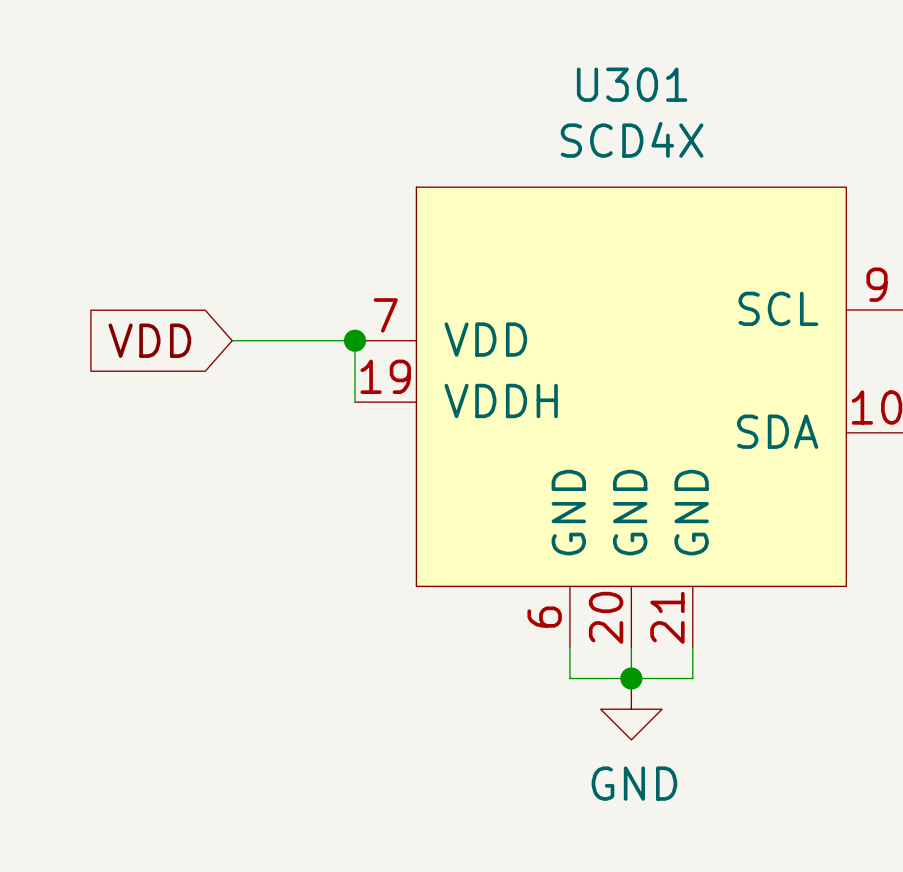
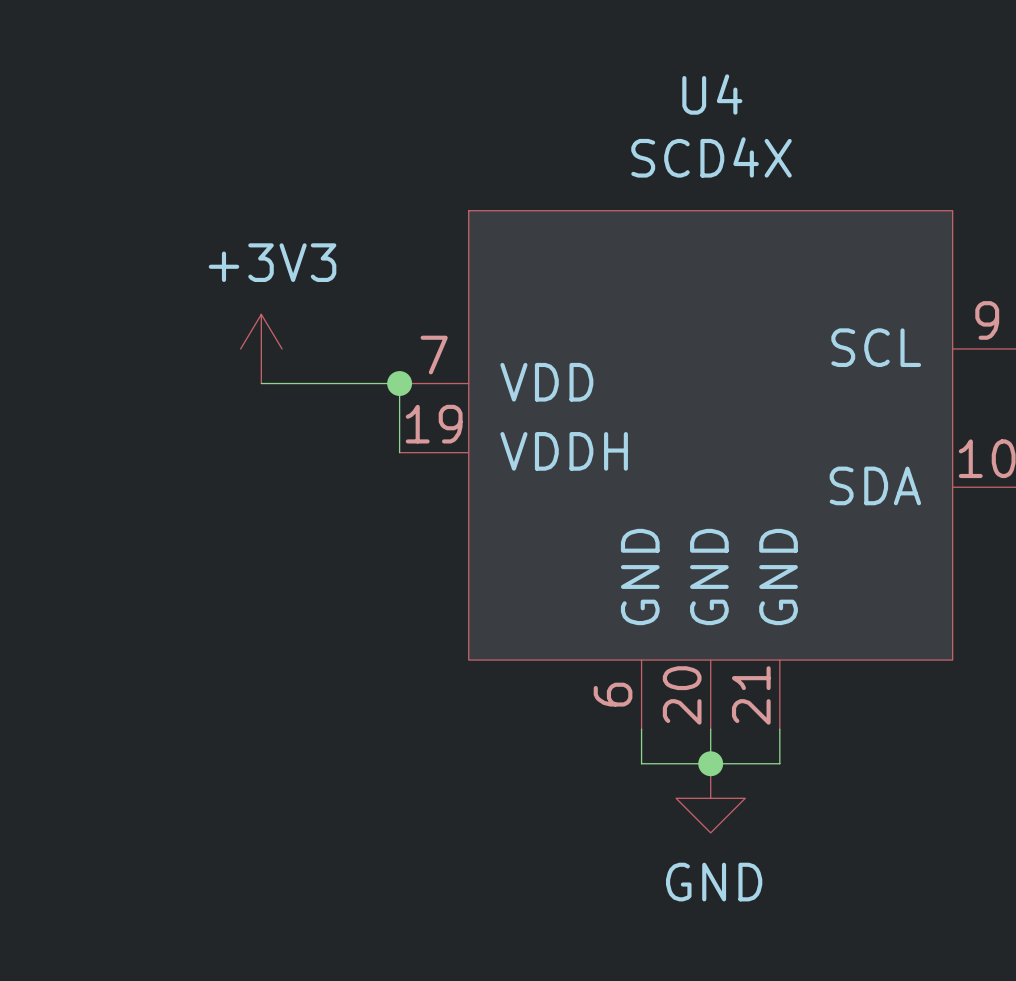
U301 name: U301 (632, 84) -> U4 (712, 94)
power symbol: none -> +3V3 (261, 348)
global label: VDD (149, 340) -> none

